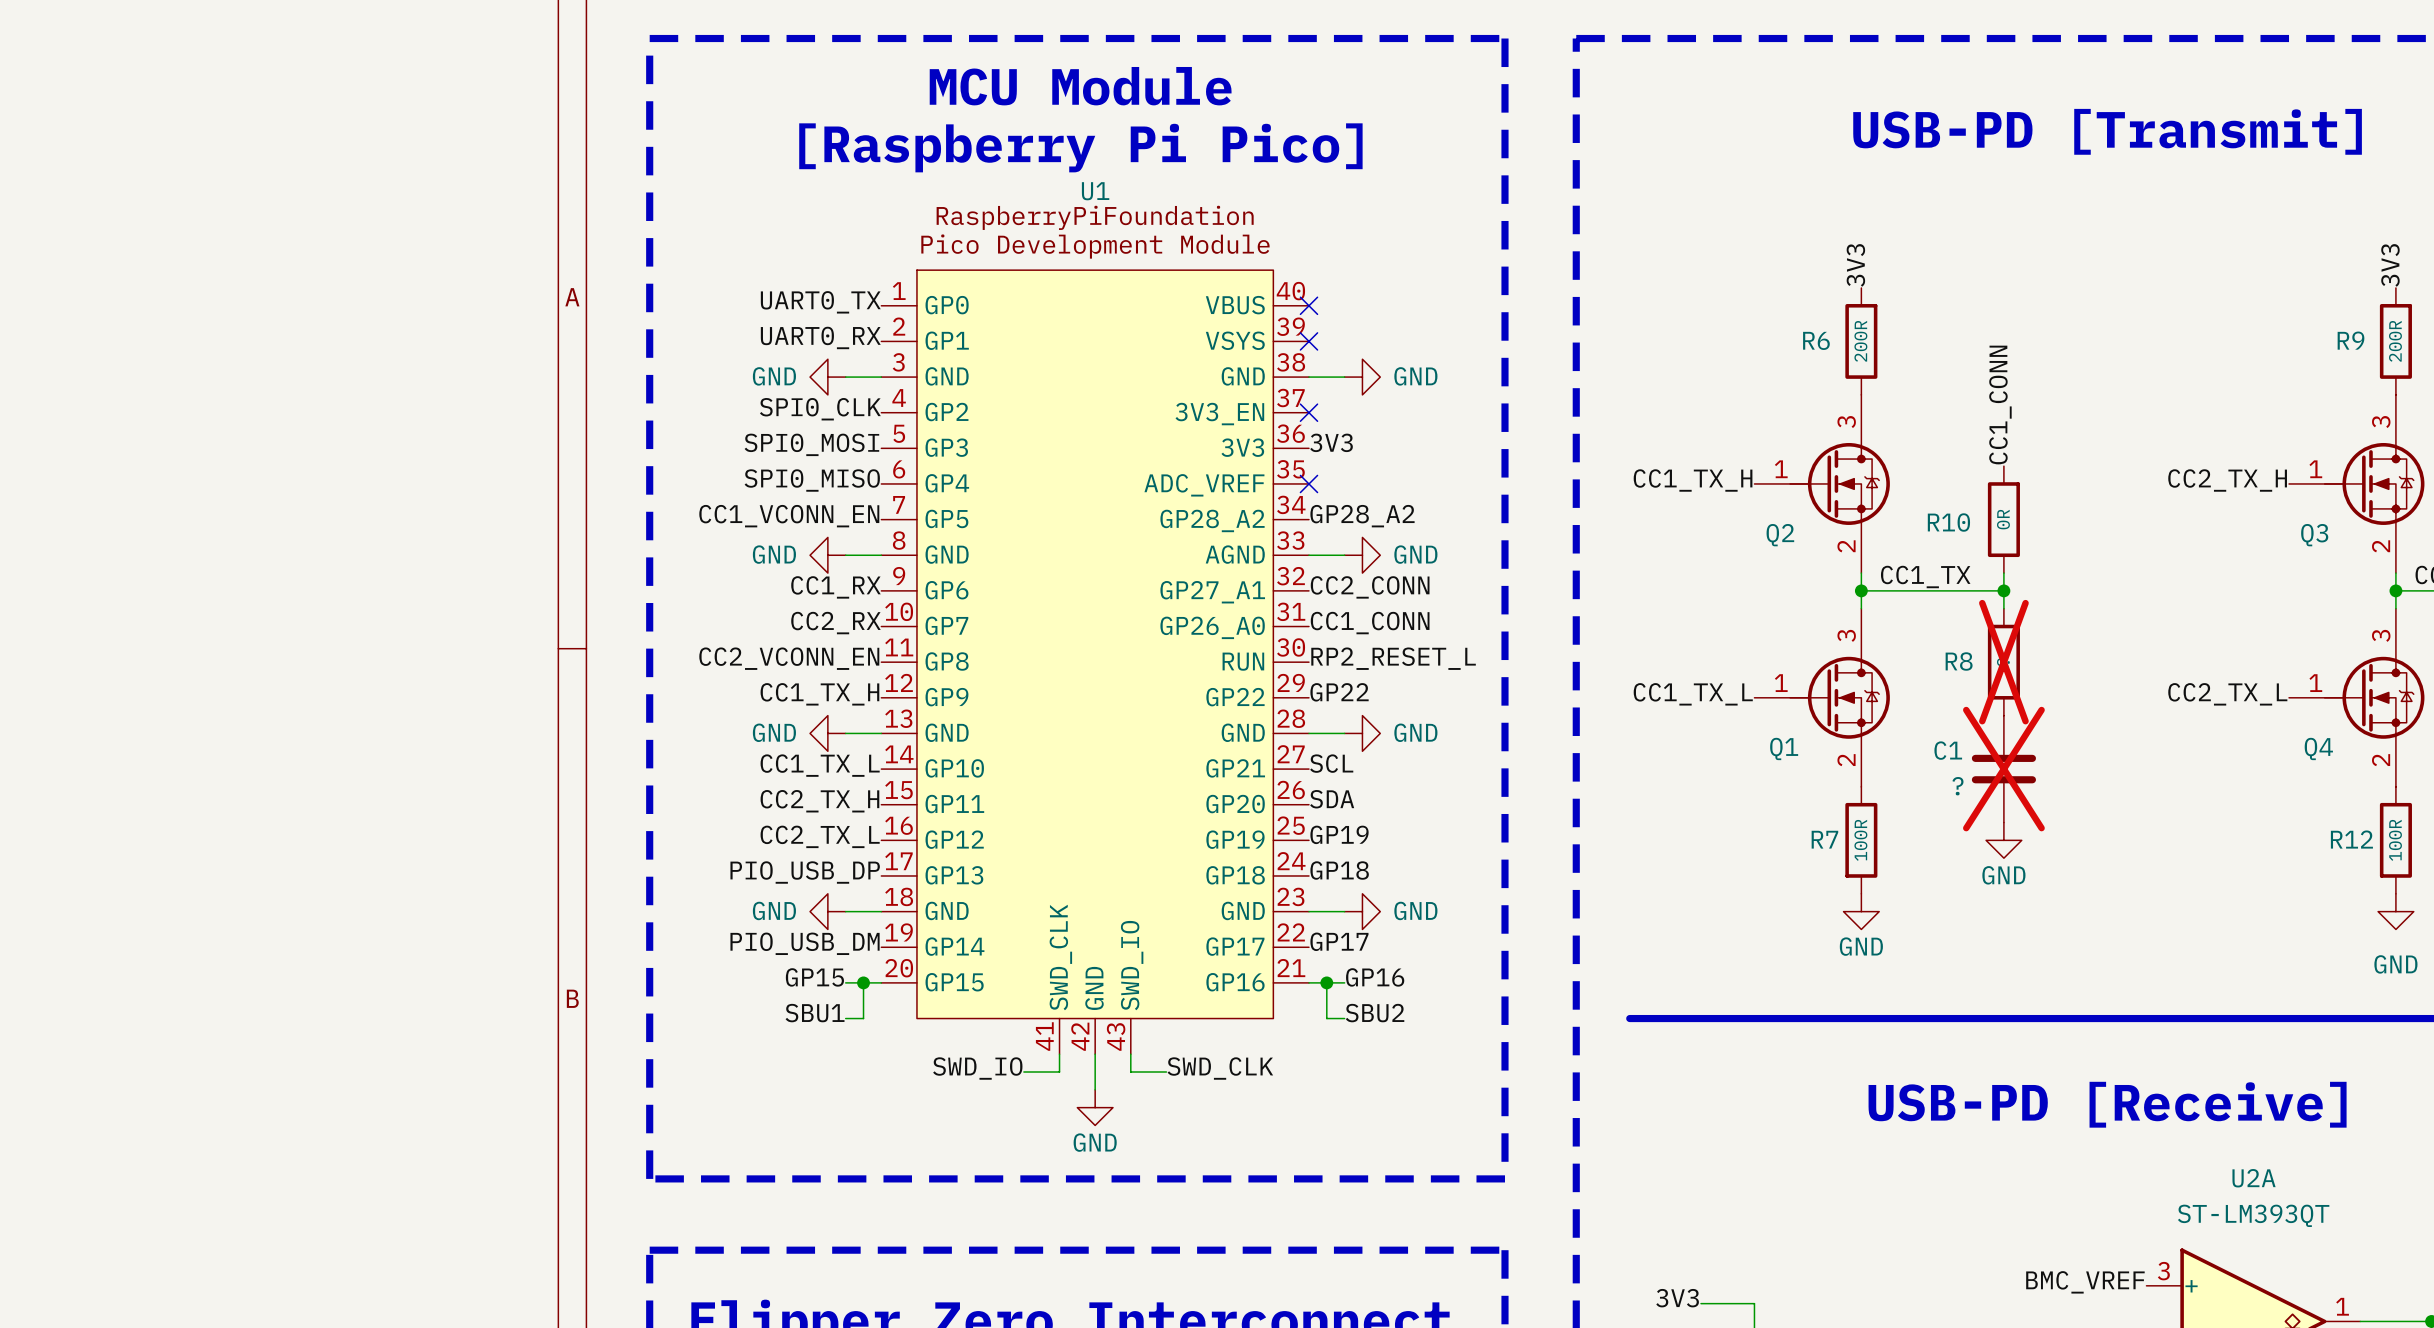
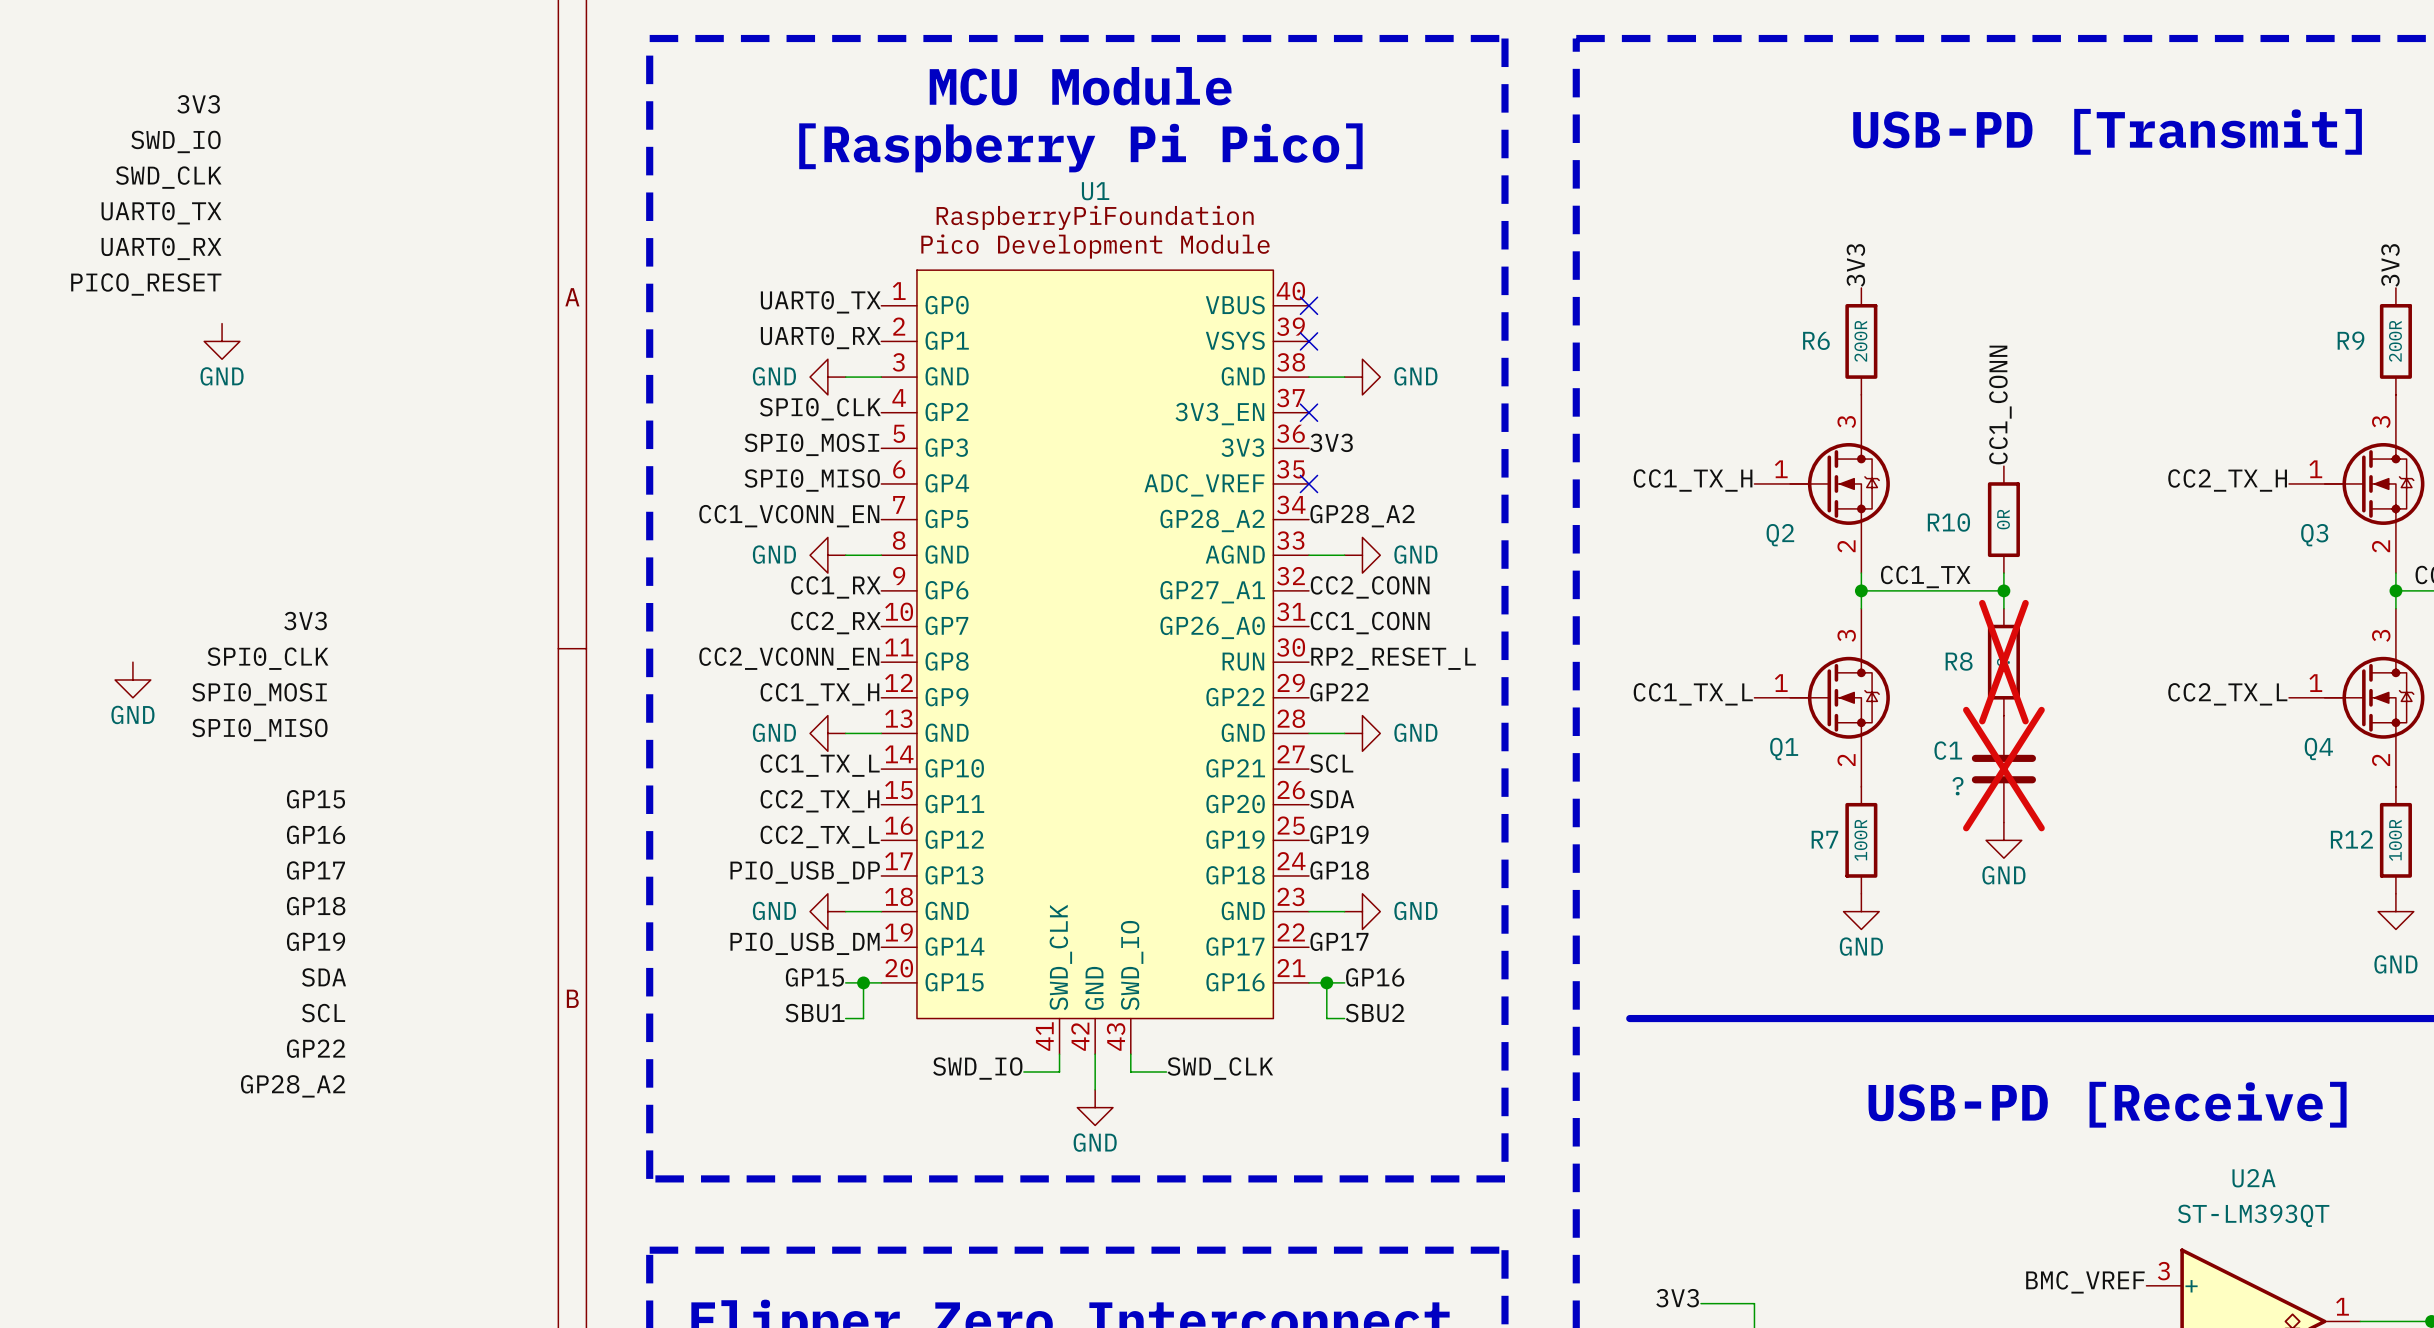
label: none -> 3V3 (198, 104)
label: none -> SWD_IO (175, 141)
label: none -> SWD_CLK (168, 177)
label: none -> UART0_TX (161, 213)
label: none -> UART0_RX (161, 248)
label: none -> PICO_RESET (146, 284)
power symbol: none -> GND (222, 341)
label: none -> 3V3 (305, 621)
label: none -> SPI0_CLK (267, 658)
power symbol: none -> GND (132, 679)
label: none -> SPI0_MOSI (259, 694)
label: none -> SPI0_MISO (259, 729)
label: none -> GP15 (315, 799)
label: none -> GP16 (316, 834)
label: none -> GP17 (315, 870)
label: none -> GP18 (316, 906)
label: none -> GP19 (316, 941)
label: none -> SDA (323, 977)
label: none -> SCL (323, 1013)
label: none -> GP22 (316, 1048)
label: none -> GP28_A2 (293, 1086)

